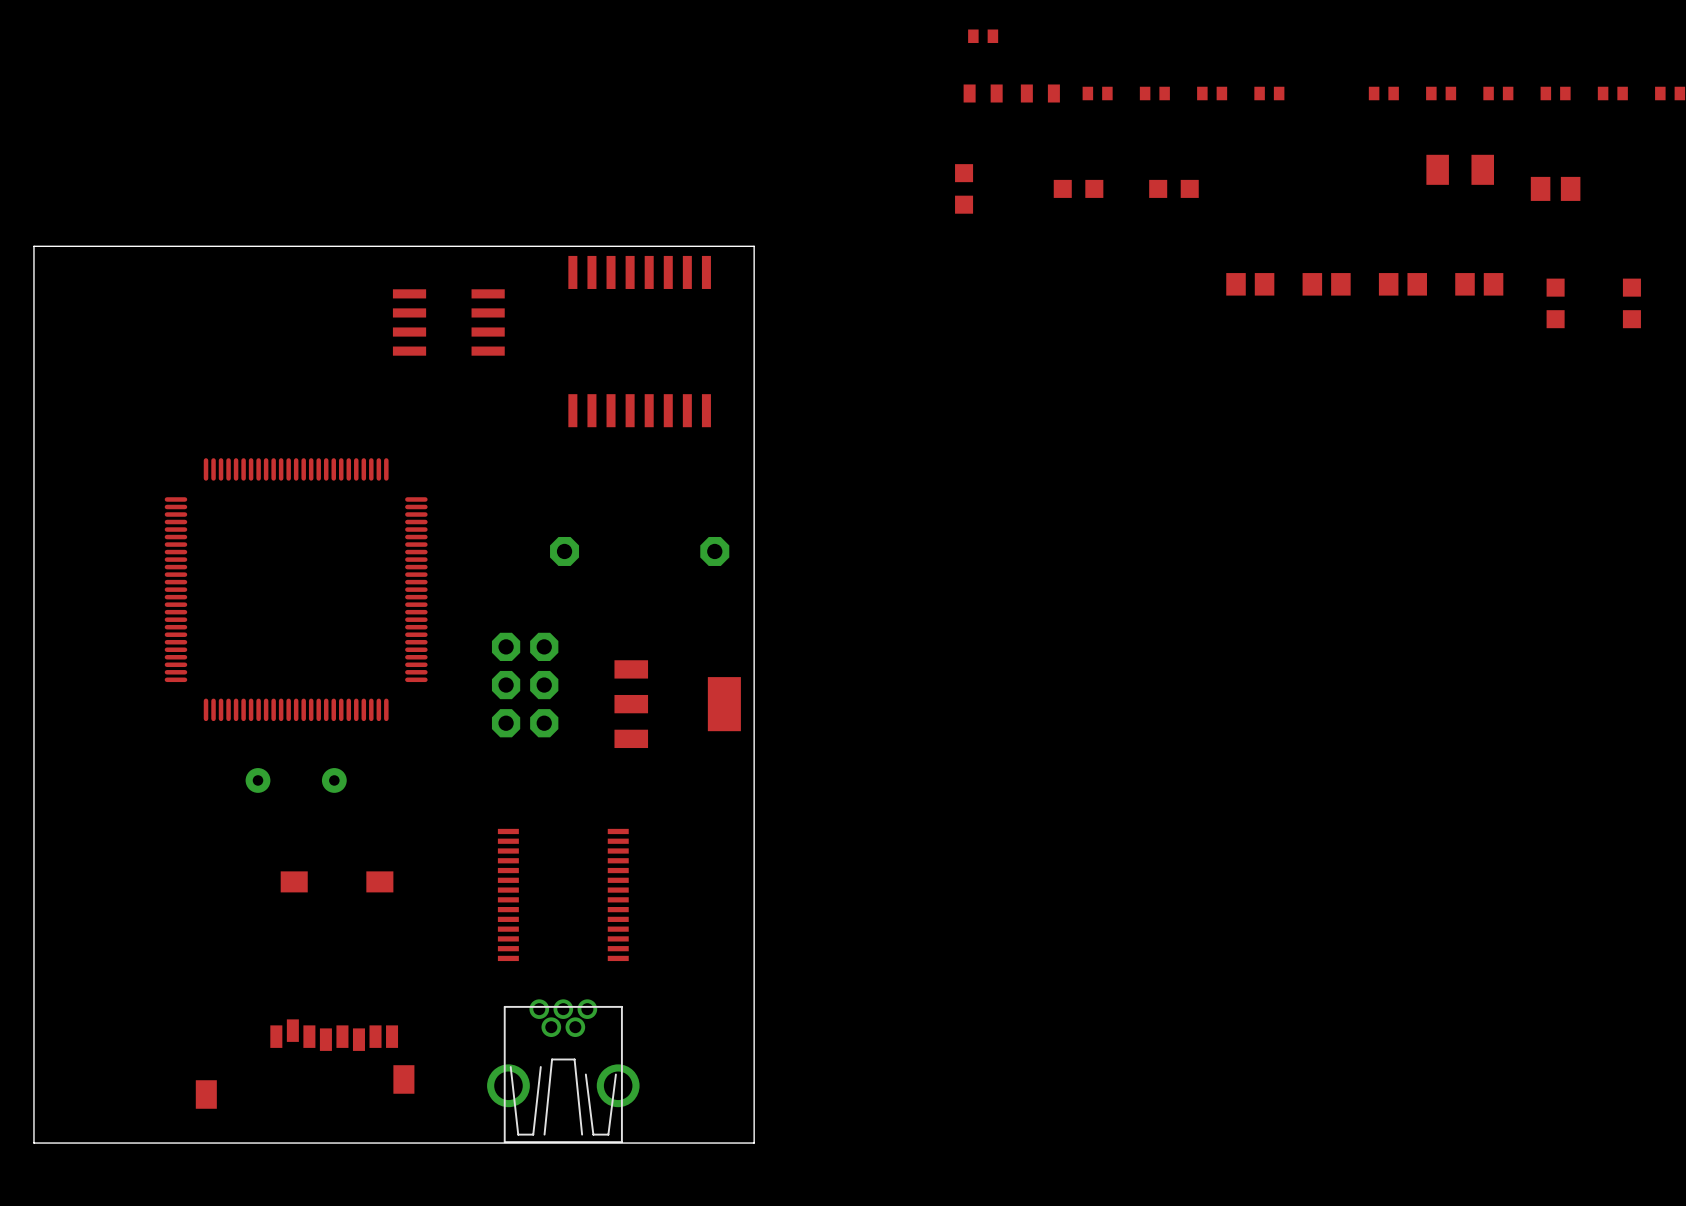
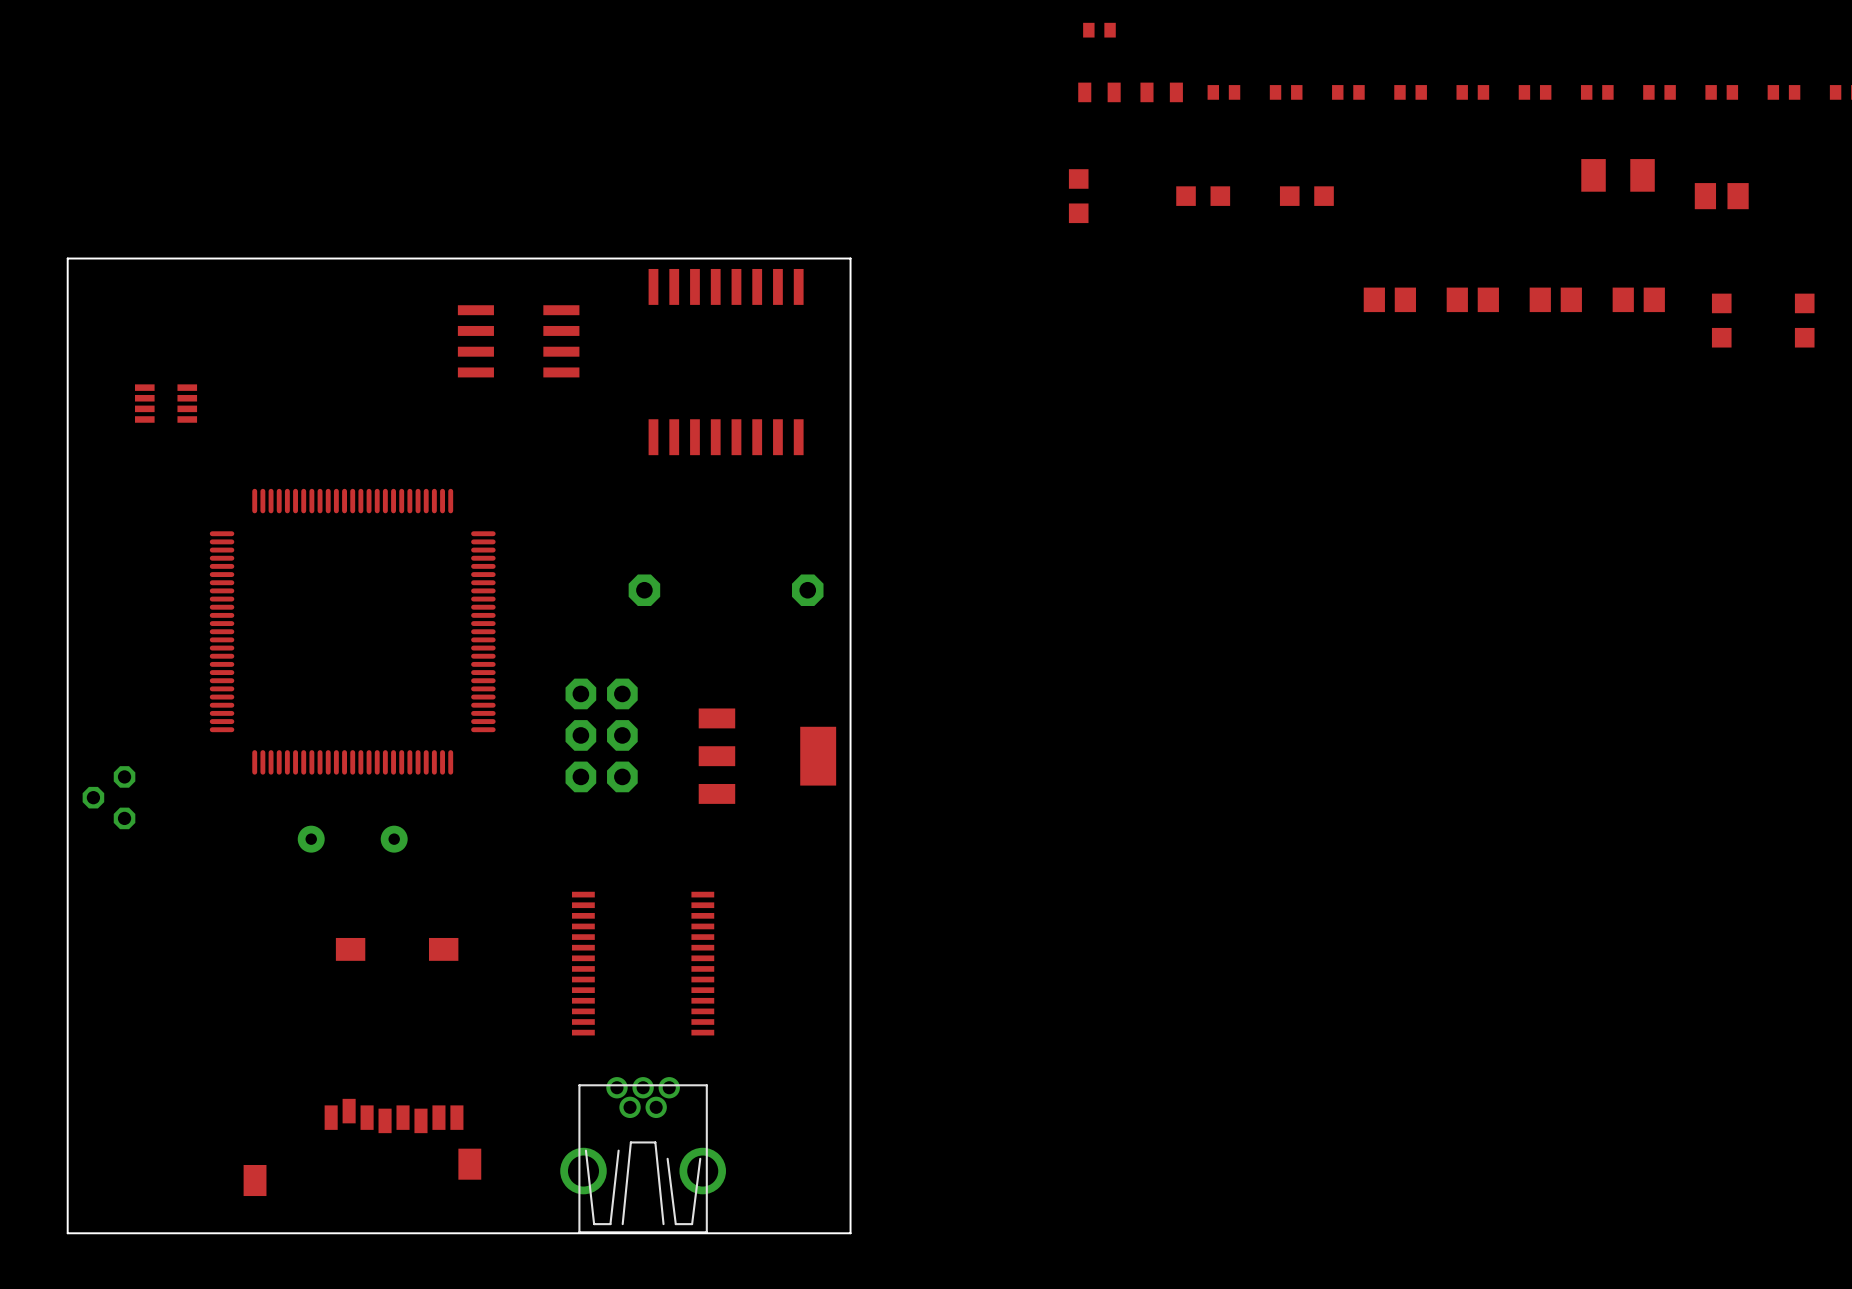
part: none -> (1472, 92)
part: none -> (166, 403)
part: none -> (108, 797)

